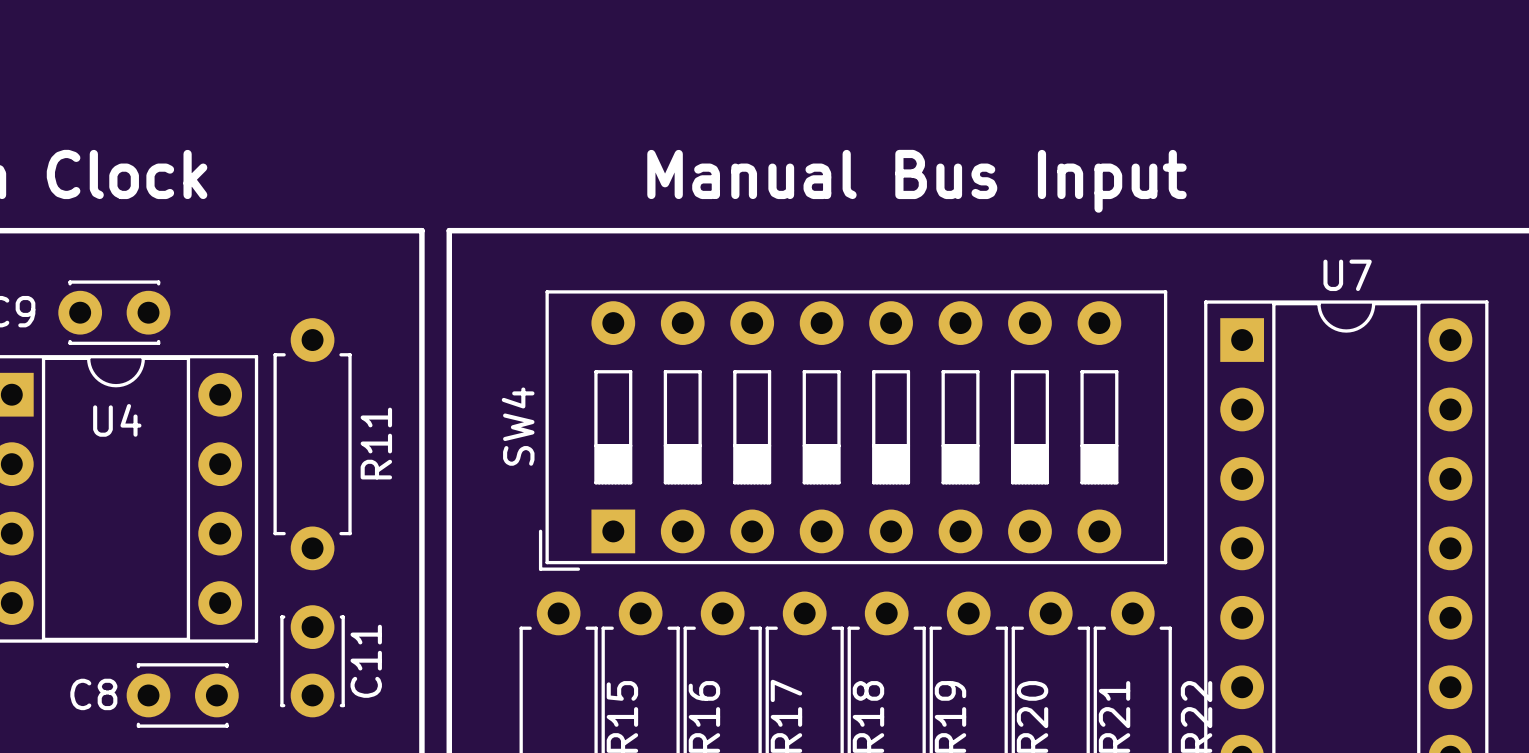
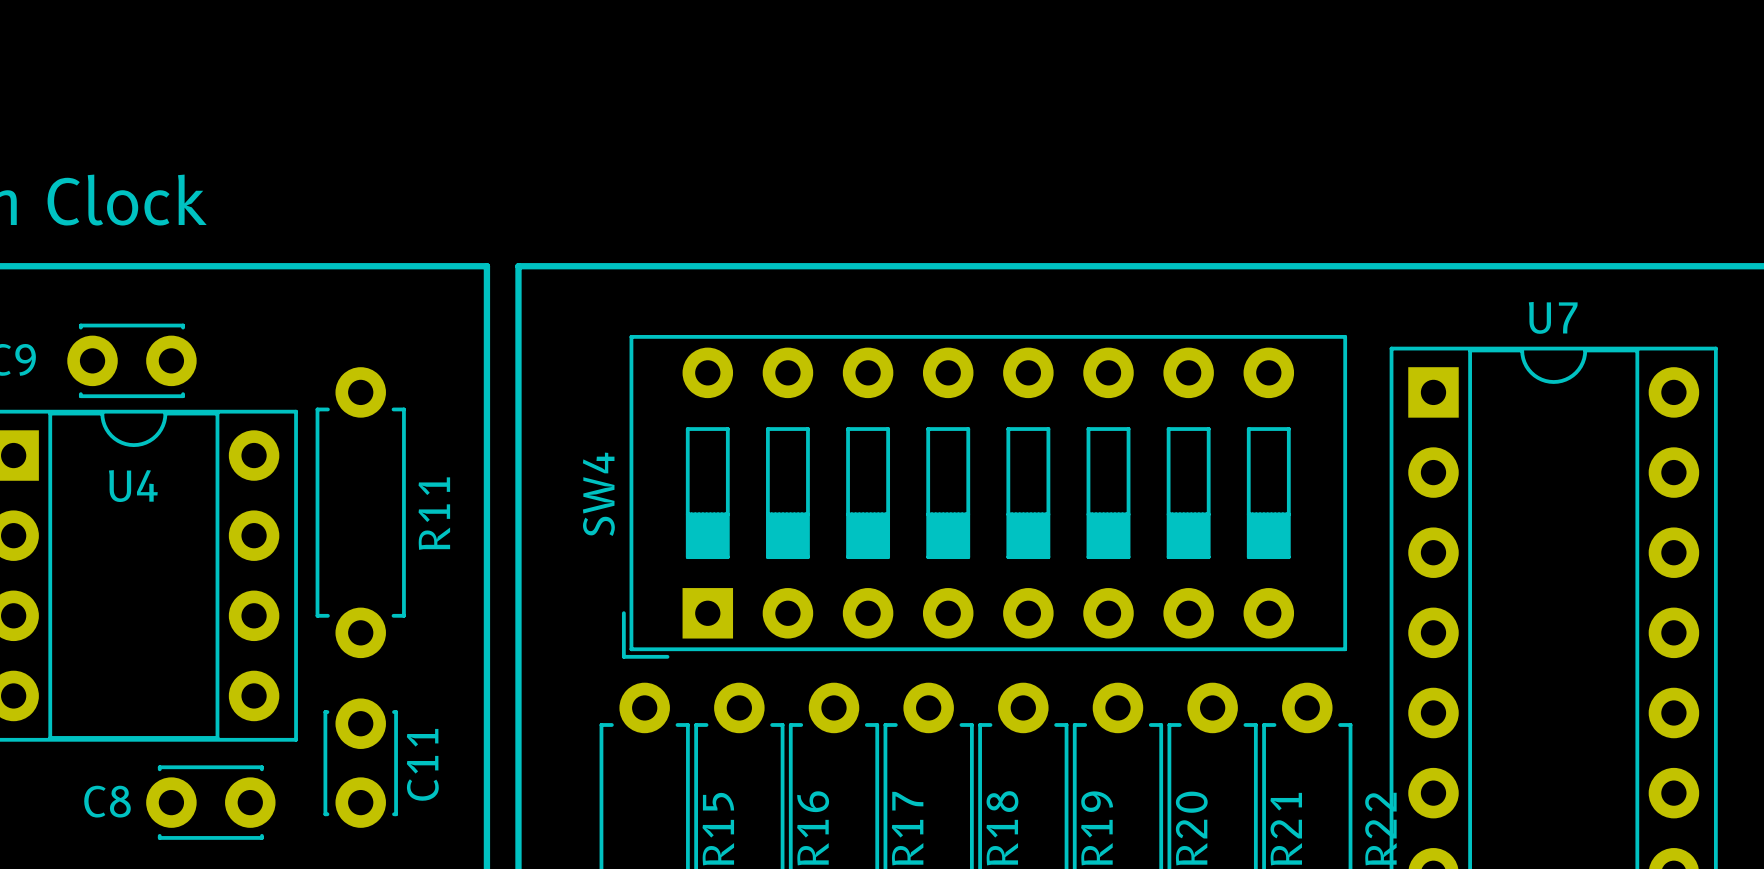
text: Manual Bus Input (916, 181) -> none

